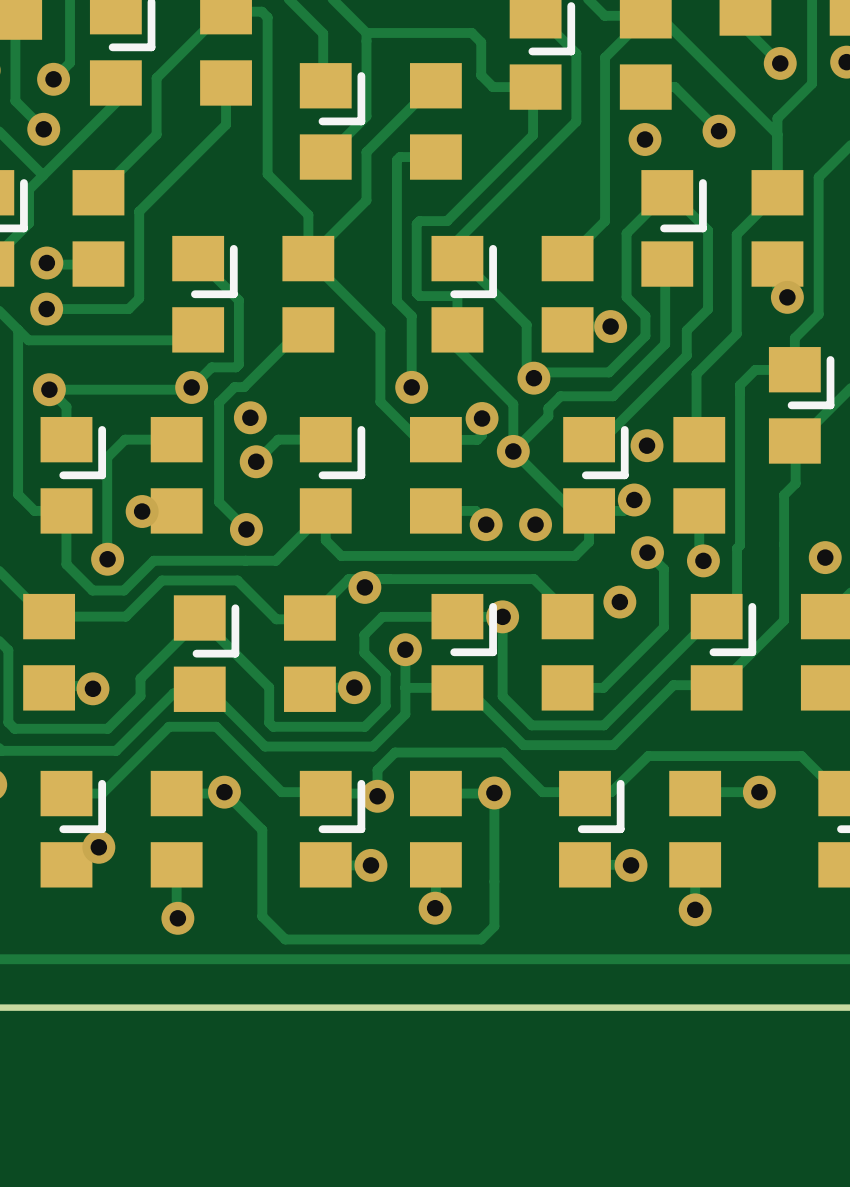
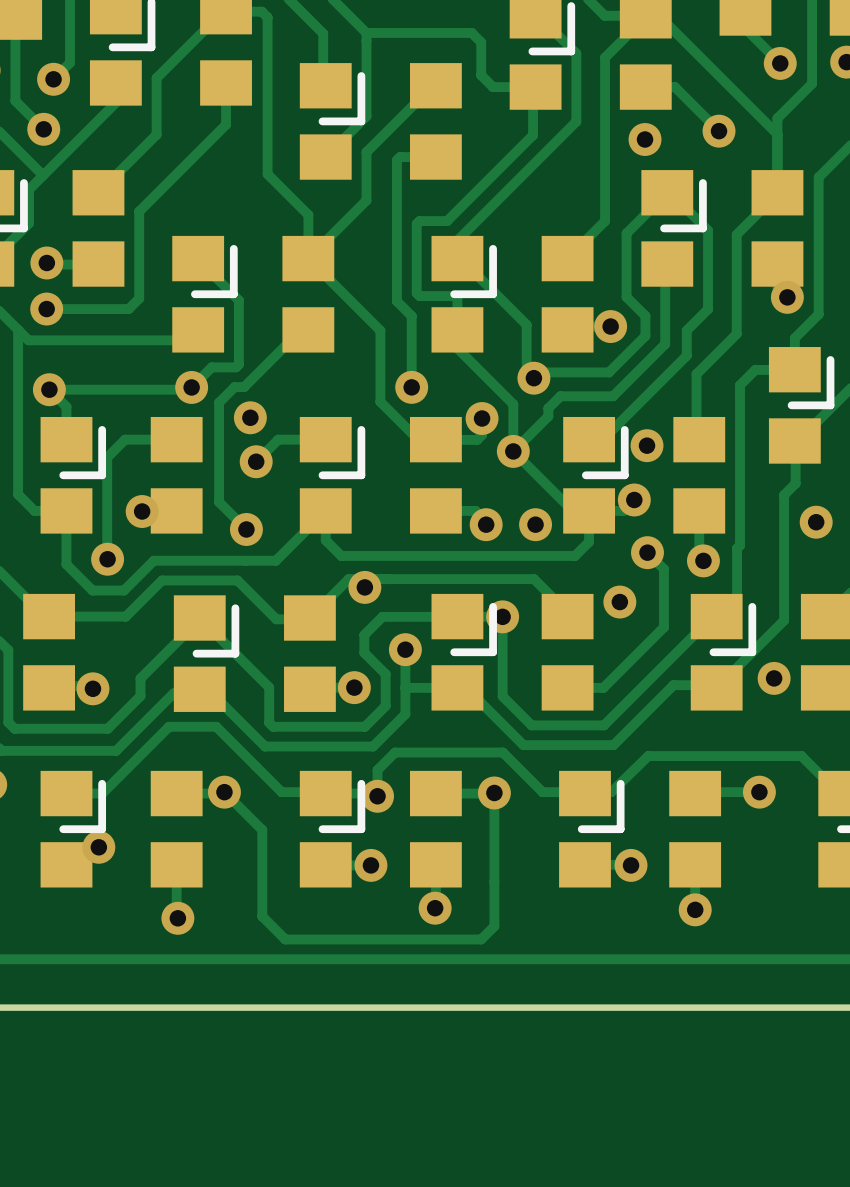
via position: (825, 557) -> (816, 522)
via: none -> (774, 678)

